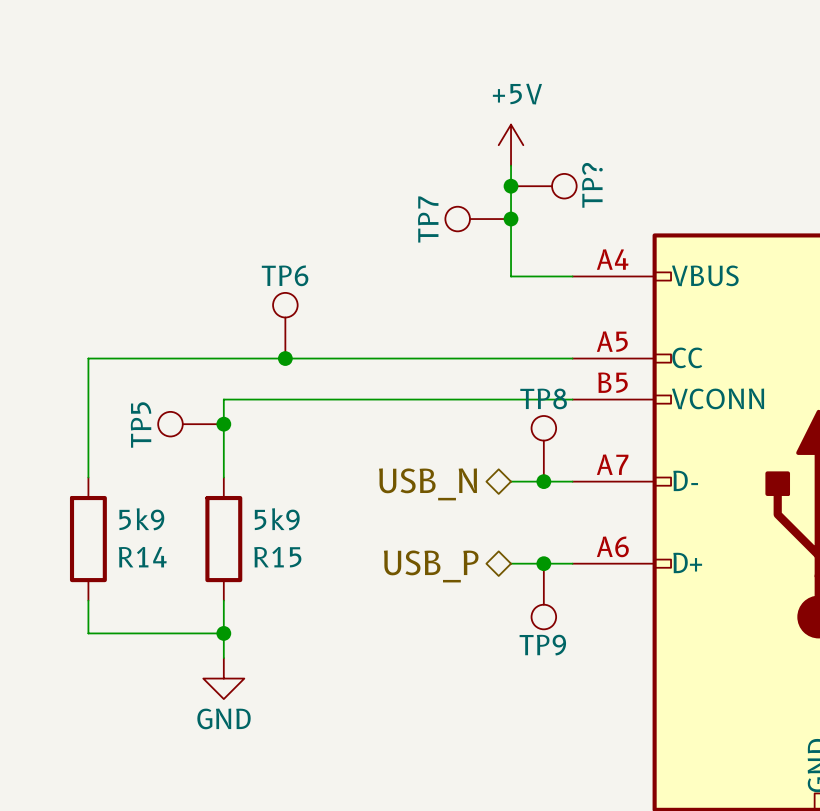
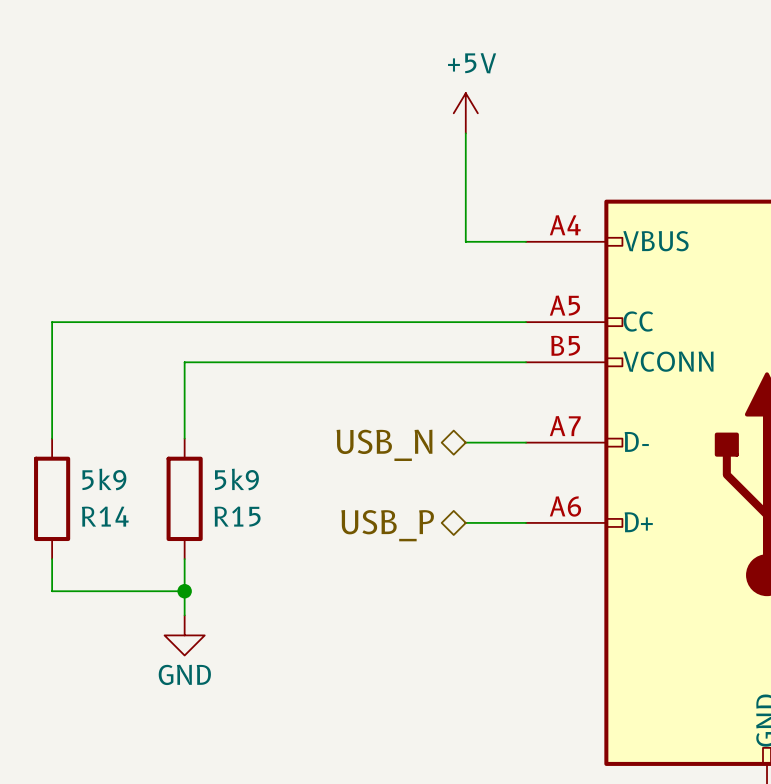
junction: (511, 186) -> none
TP?: (543, 186) -> none
TP7: (478, 219) -> none
junction: (511, 219) -> none
TP6: (285, 325) -> none
junction: (285, 358) -> none
TP5: (190, 424) -> none
junction: (223, 424) -> none
TP8: (543, 448) -> none
junction: (543, 481) -> none
junction: (543, 563) -> none
TP9: (543, 596) -> none

